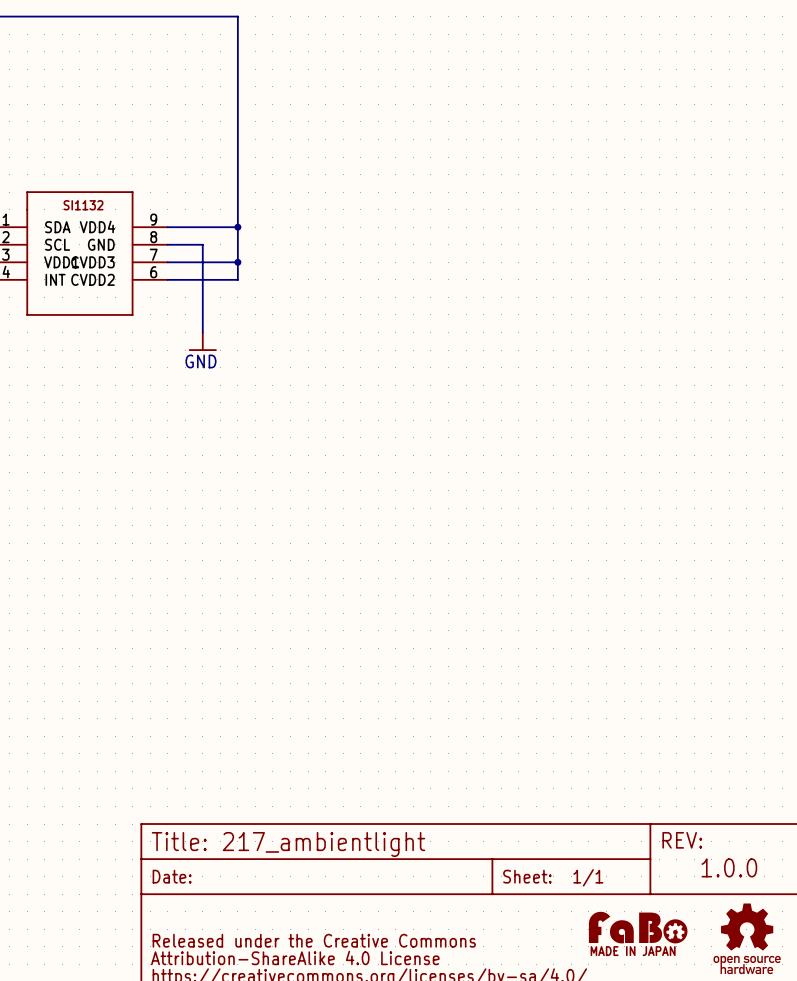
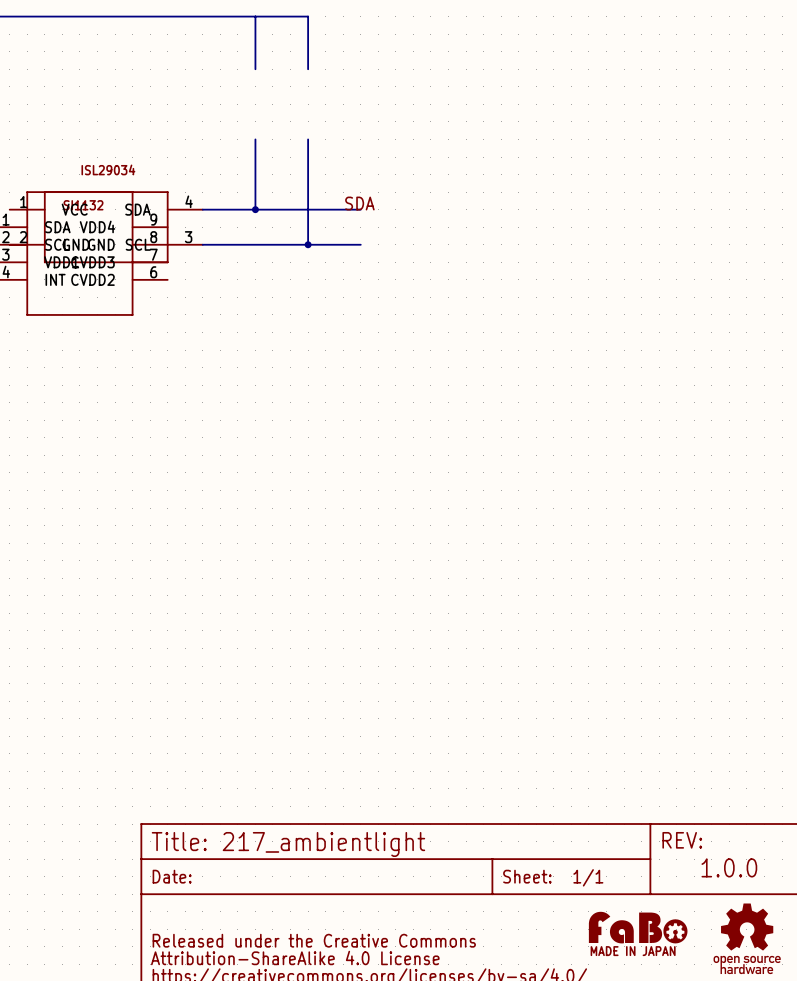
wire: (237, 16) (237, 279) (167, 279) -> (237, 16) (308, 16) (308, 69)
wire: none -> (255, 16) (255, 69)
wire: none -> (255, 139) (255, 209)
wire: none -> (308, 139) (308, 244)
label: none -> SDA (359, 203)
wire: none -> (202, 209) (360, 209)
part: none -> (106, 227)
wire: (167, 227) (237, 227) -> none
junction position: (237, 227) -> (255, 209)
wire: (167, 244) (202, 244) (202, 332) -> none
wire: none -> (202, 244) (360, 244)
junction: none -> (308, 244)
wire: (167, 262) (237, 262) -> none
junction: (237, 262) -> none
power symbol: GND (202, 341) -> none

